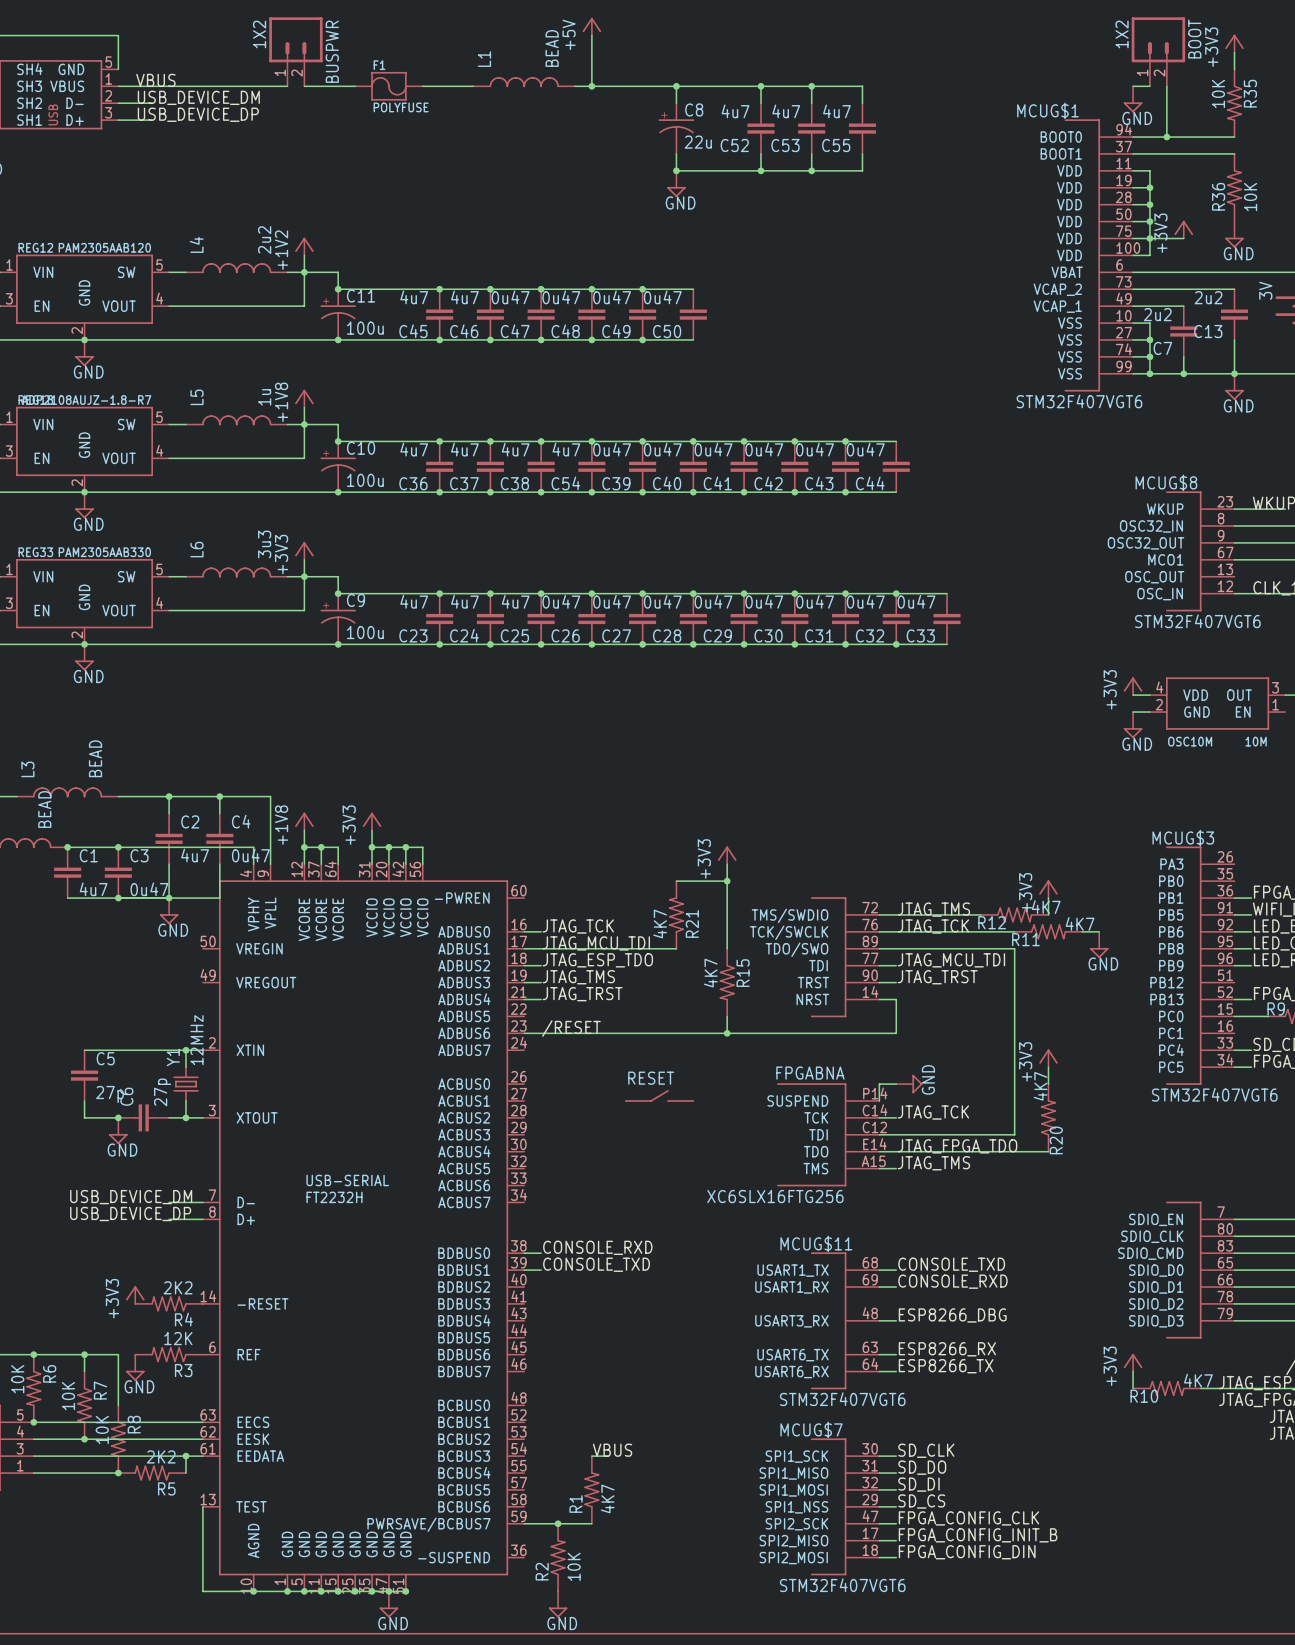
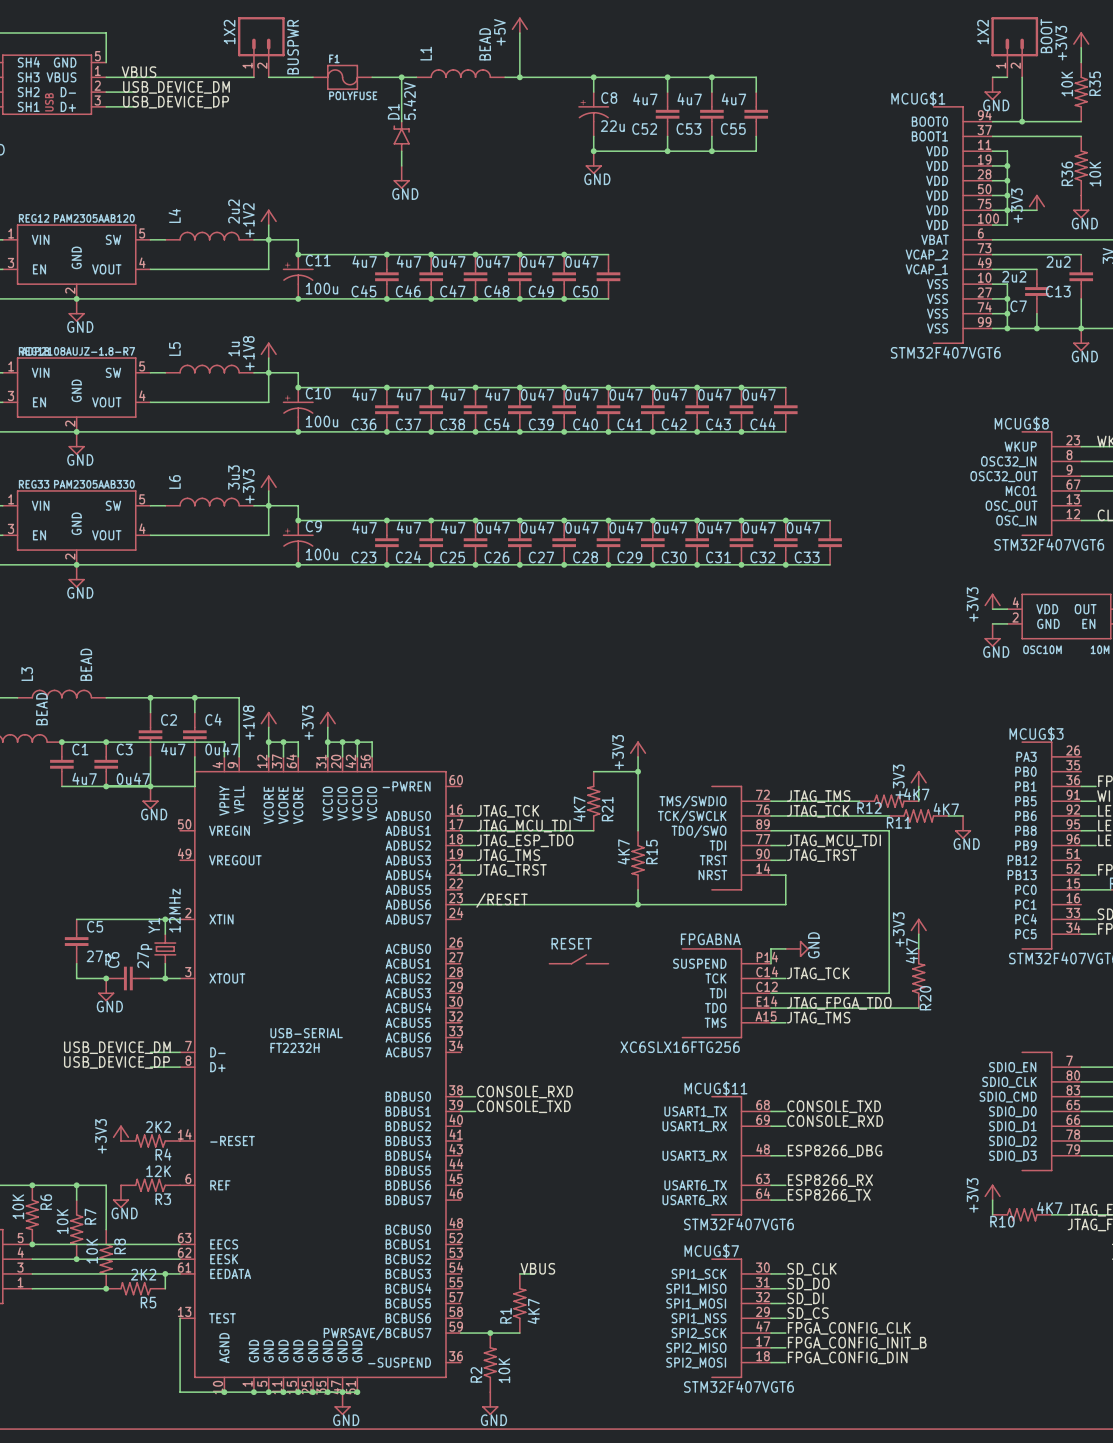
wire: none -> (401, 77) (401, 121)
junction: none -> (401, 77)
D1: none -> 5.42V (401, 136)
wire: none -> (401, 151) (401, 165)
power symbol: none -> GND (401, 177)

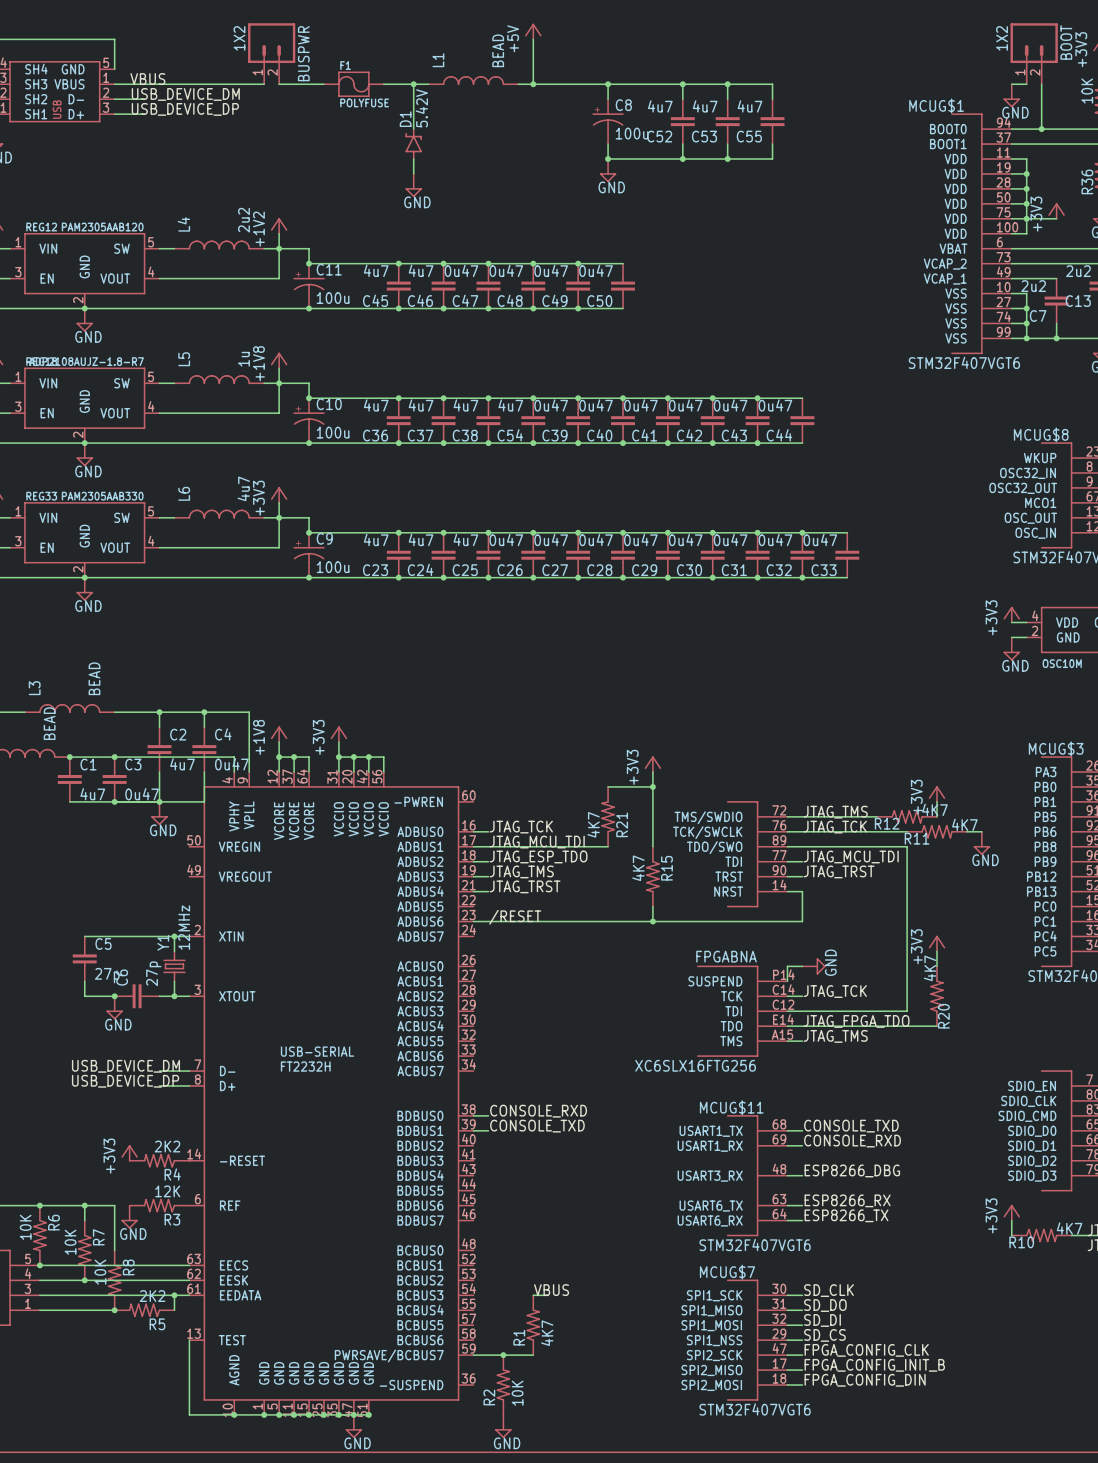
C8 value: 22u (612, 126) -> 100u (632, 133)
L6 value: 3u3 (234, 477) -> 4u7 (243, 488)
RESET: (578, 959) -> none

